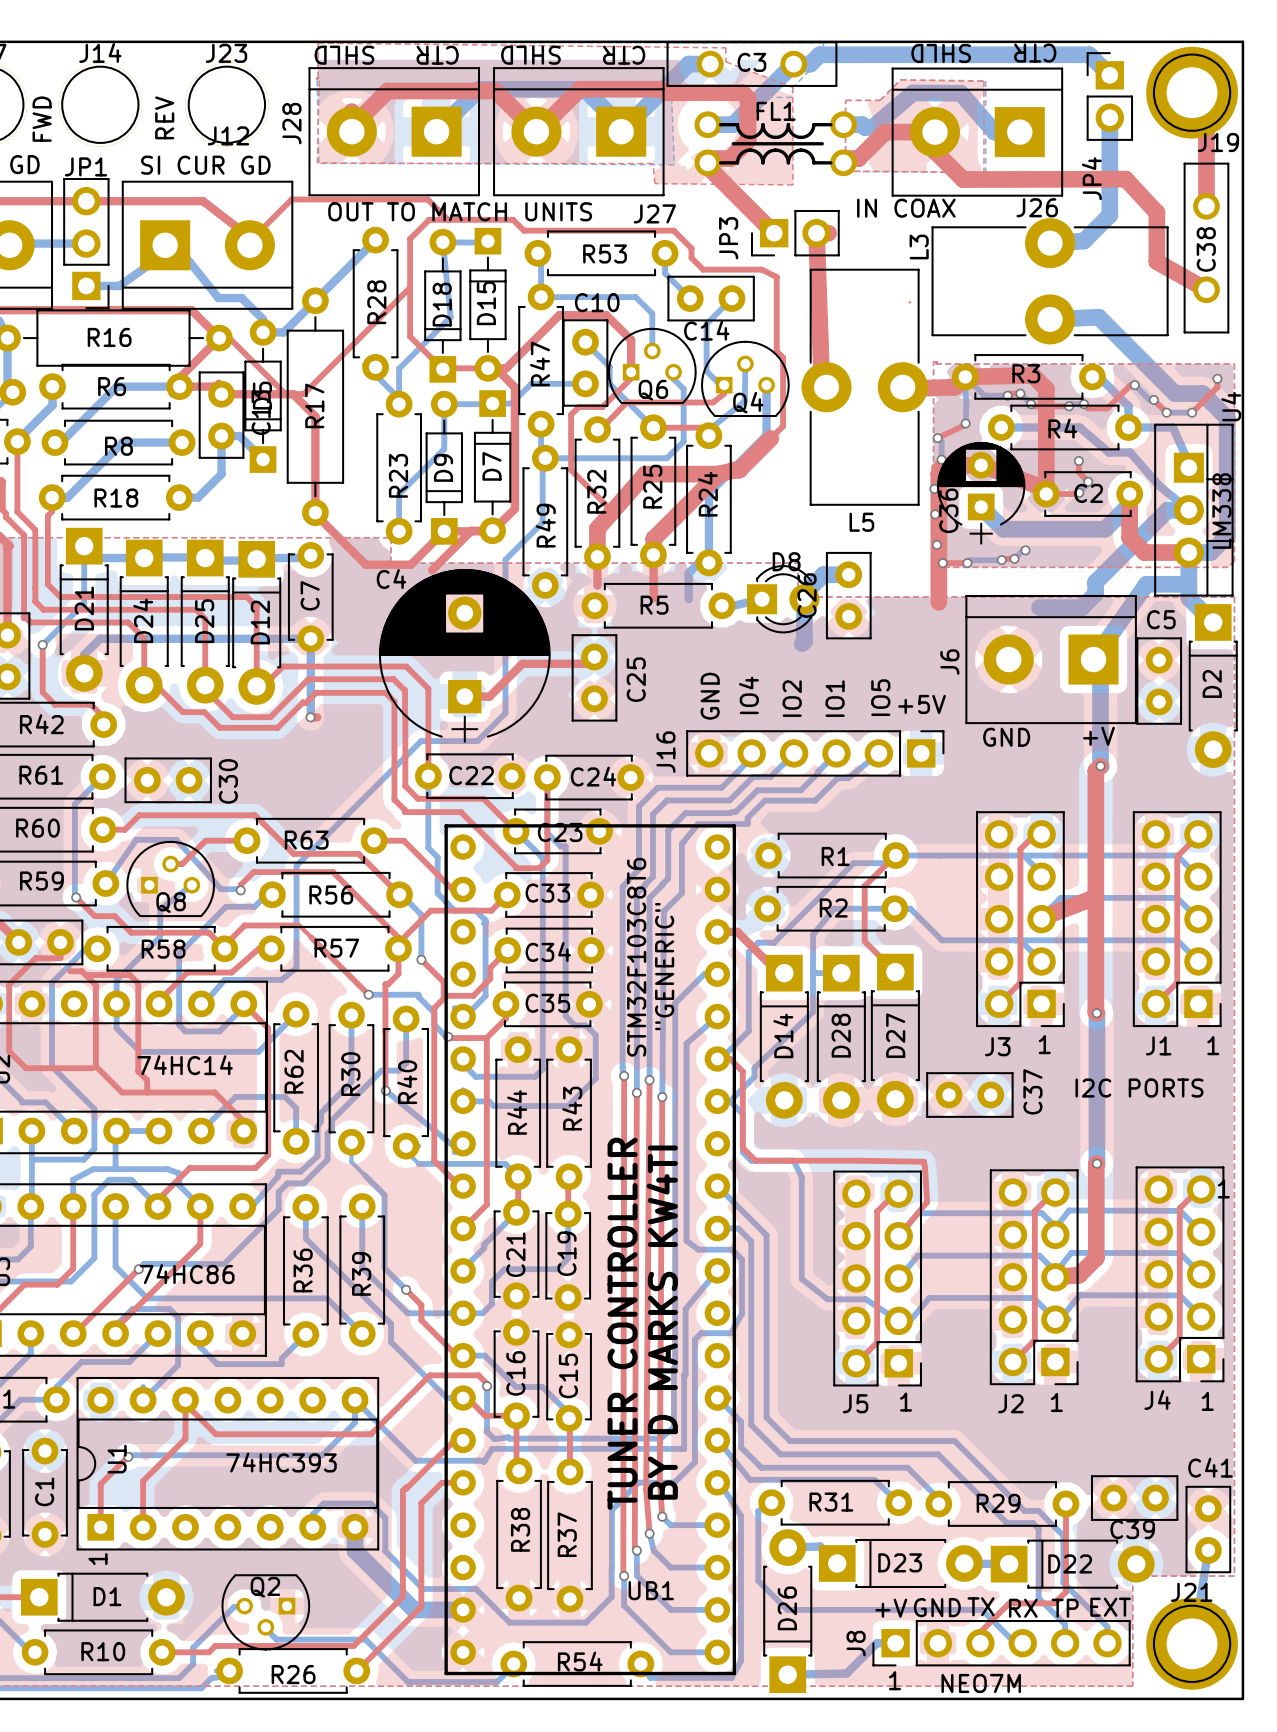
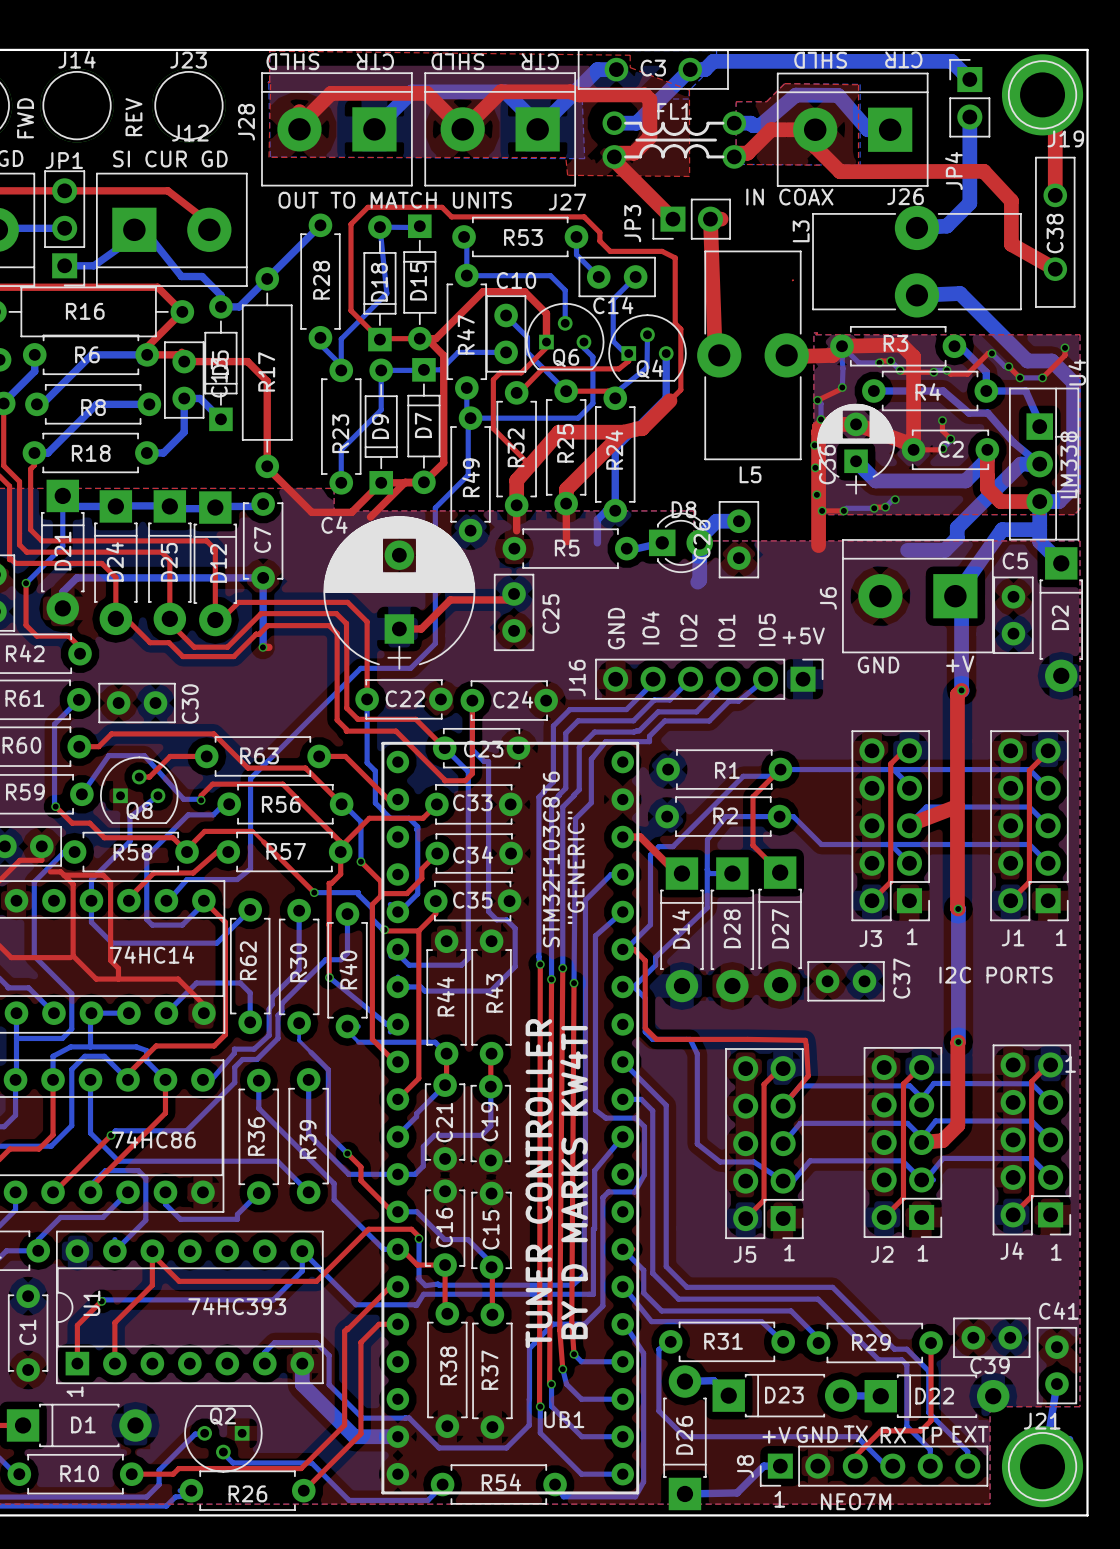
top track: (448, 219) (427, 199) (291, 199) (249, 241) (249, 245) -> none
top track: (410, 287) (303, 394) (285, 394) -> none
top track: (219, 338) (229, 338) (285, 394) (293, 394) -> none

